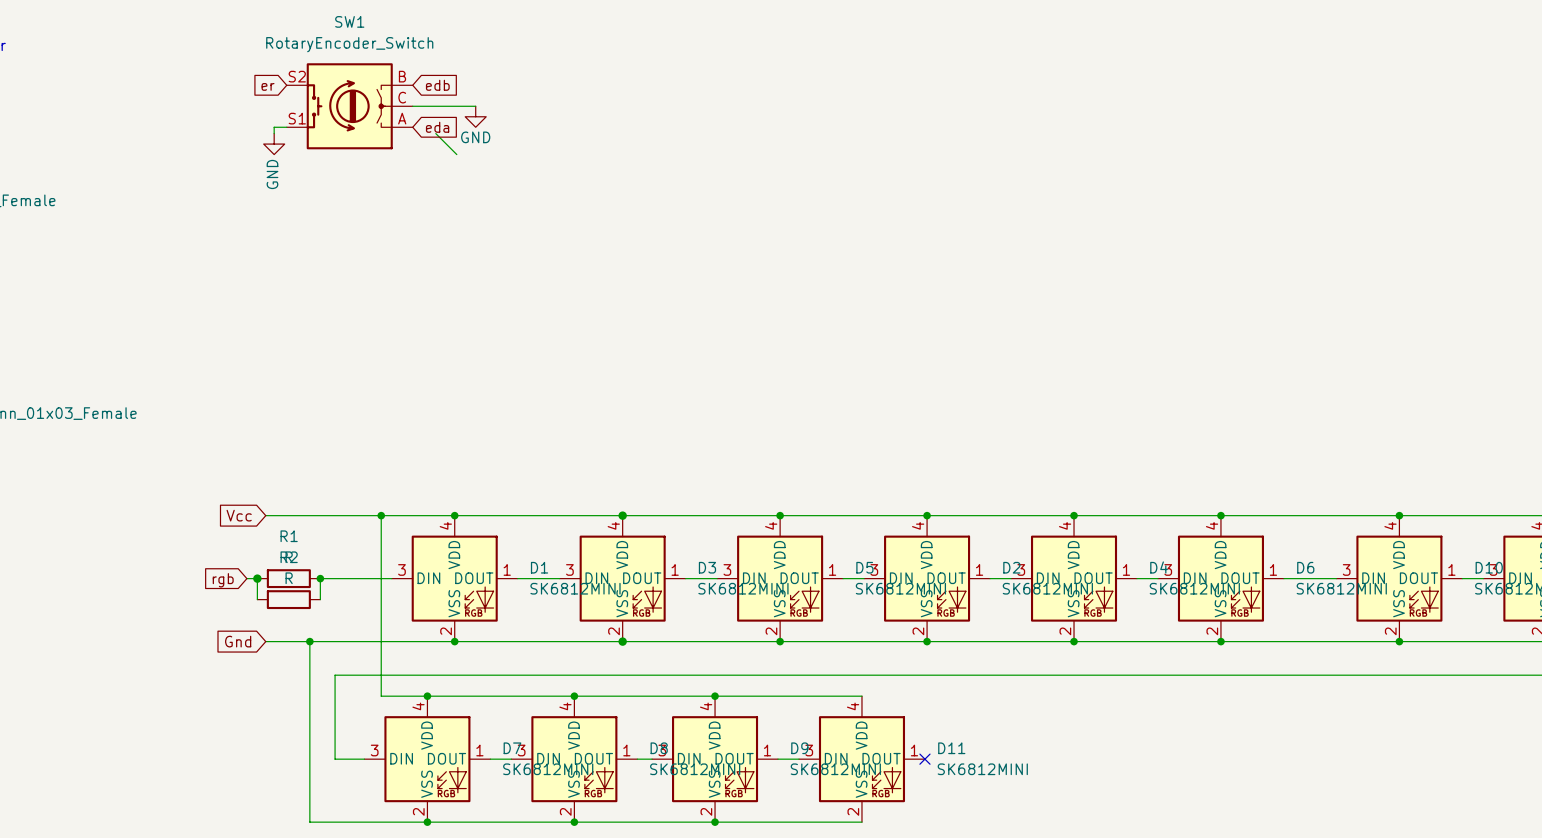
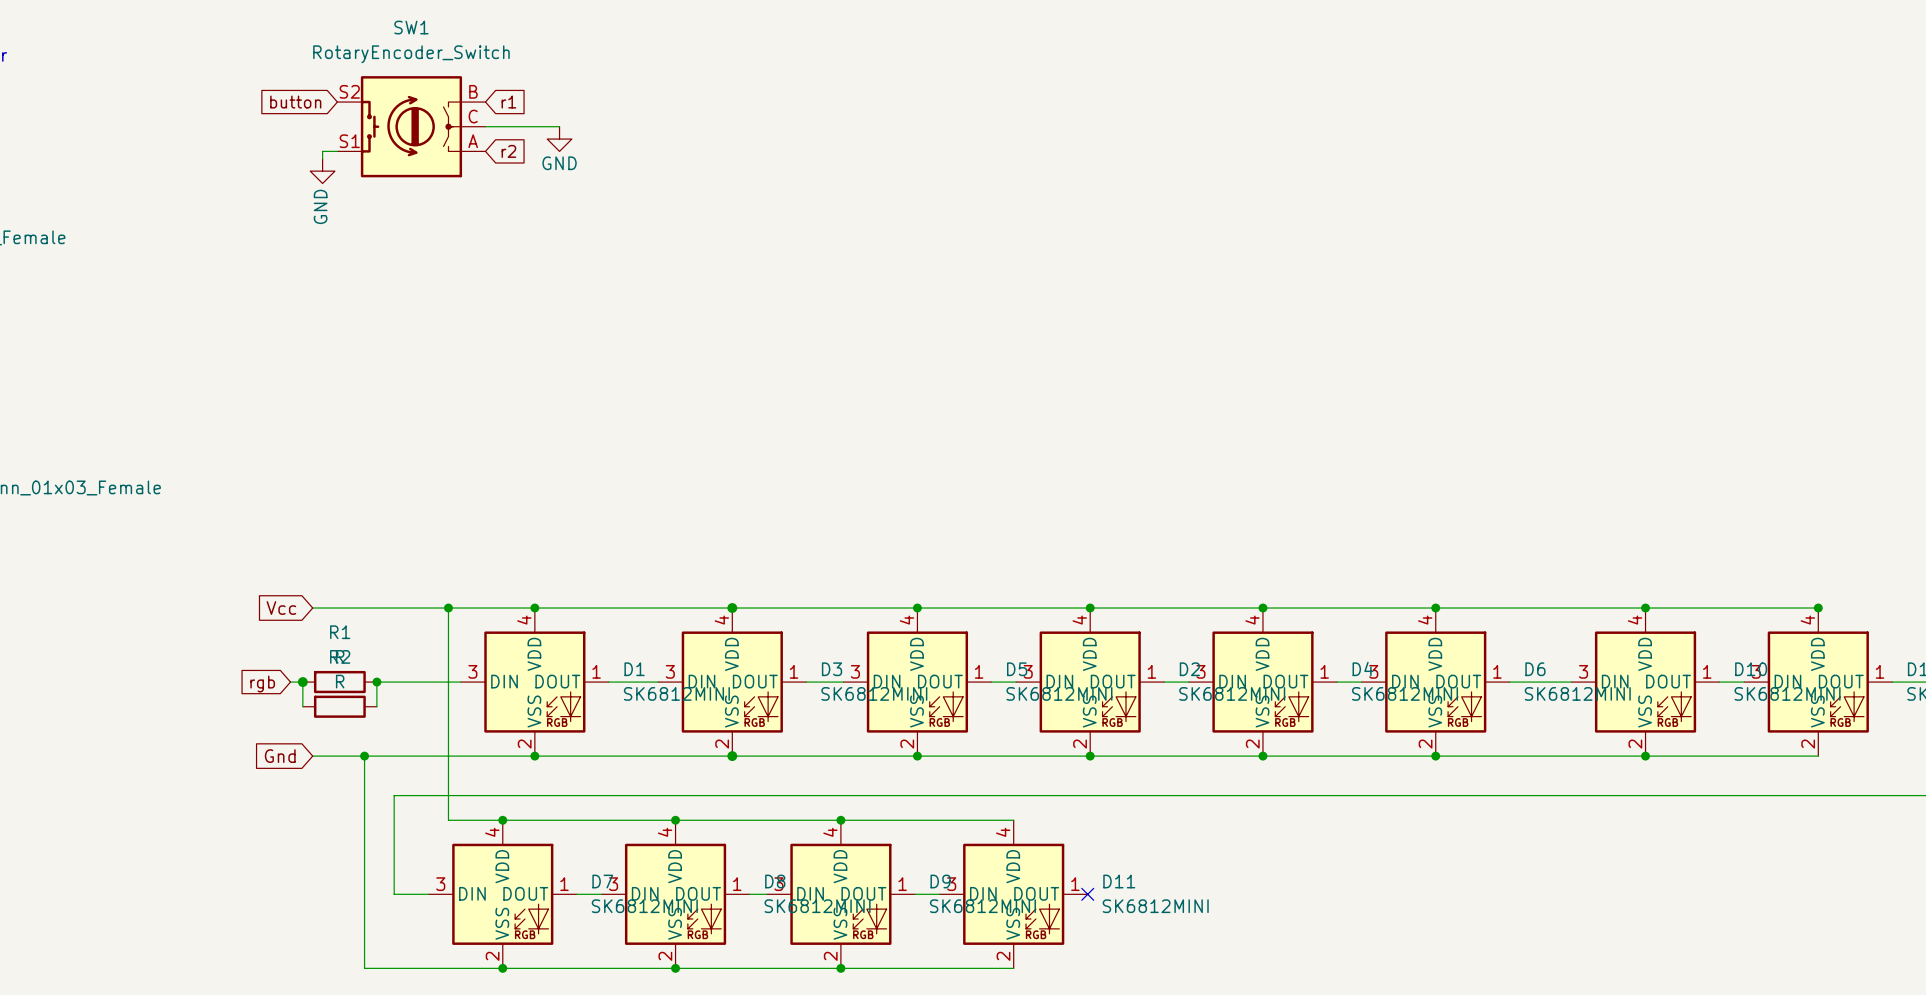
global label: edb (437, 85) -> r1 (508, 102)
global label: er (268, 86) -> button (295, 102)
global label: eda (437, 127) -> r2 (508, 151)
wire: (435, 133) (456, 154) -> none

